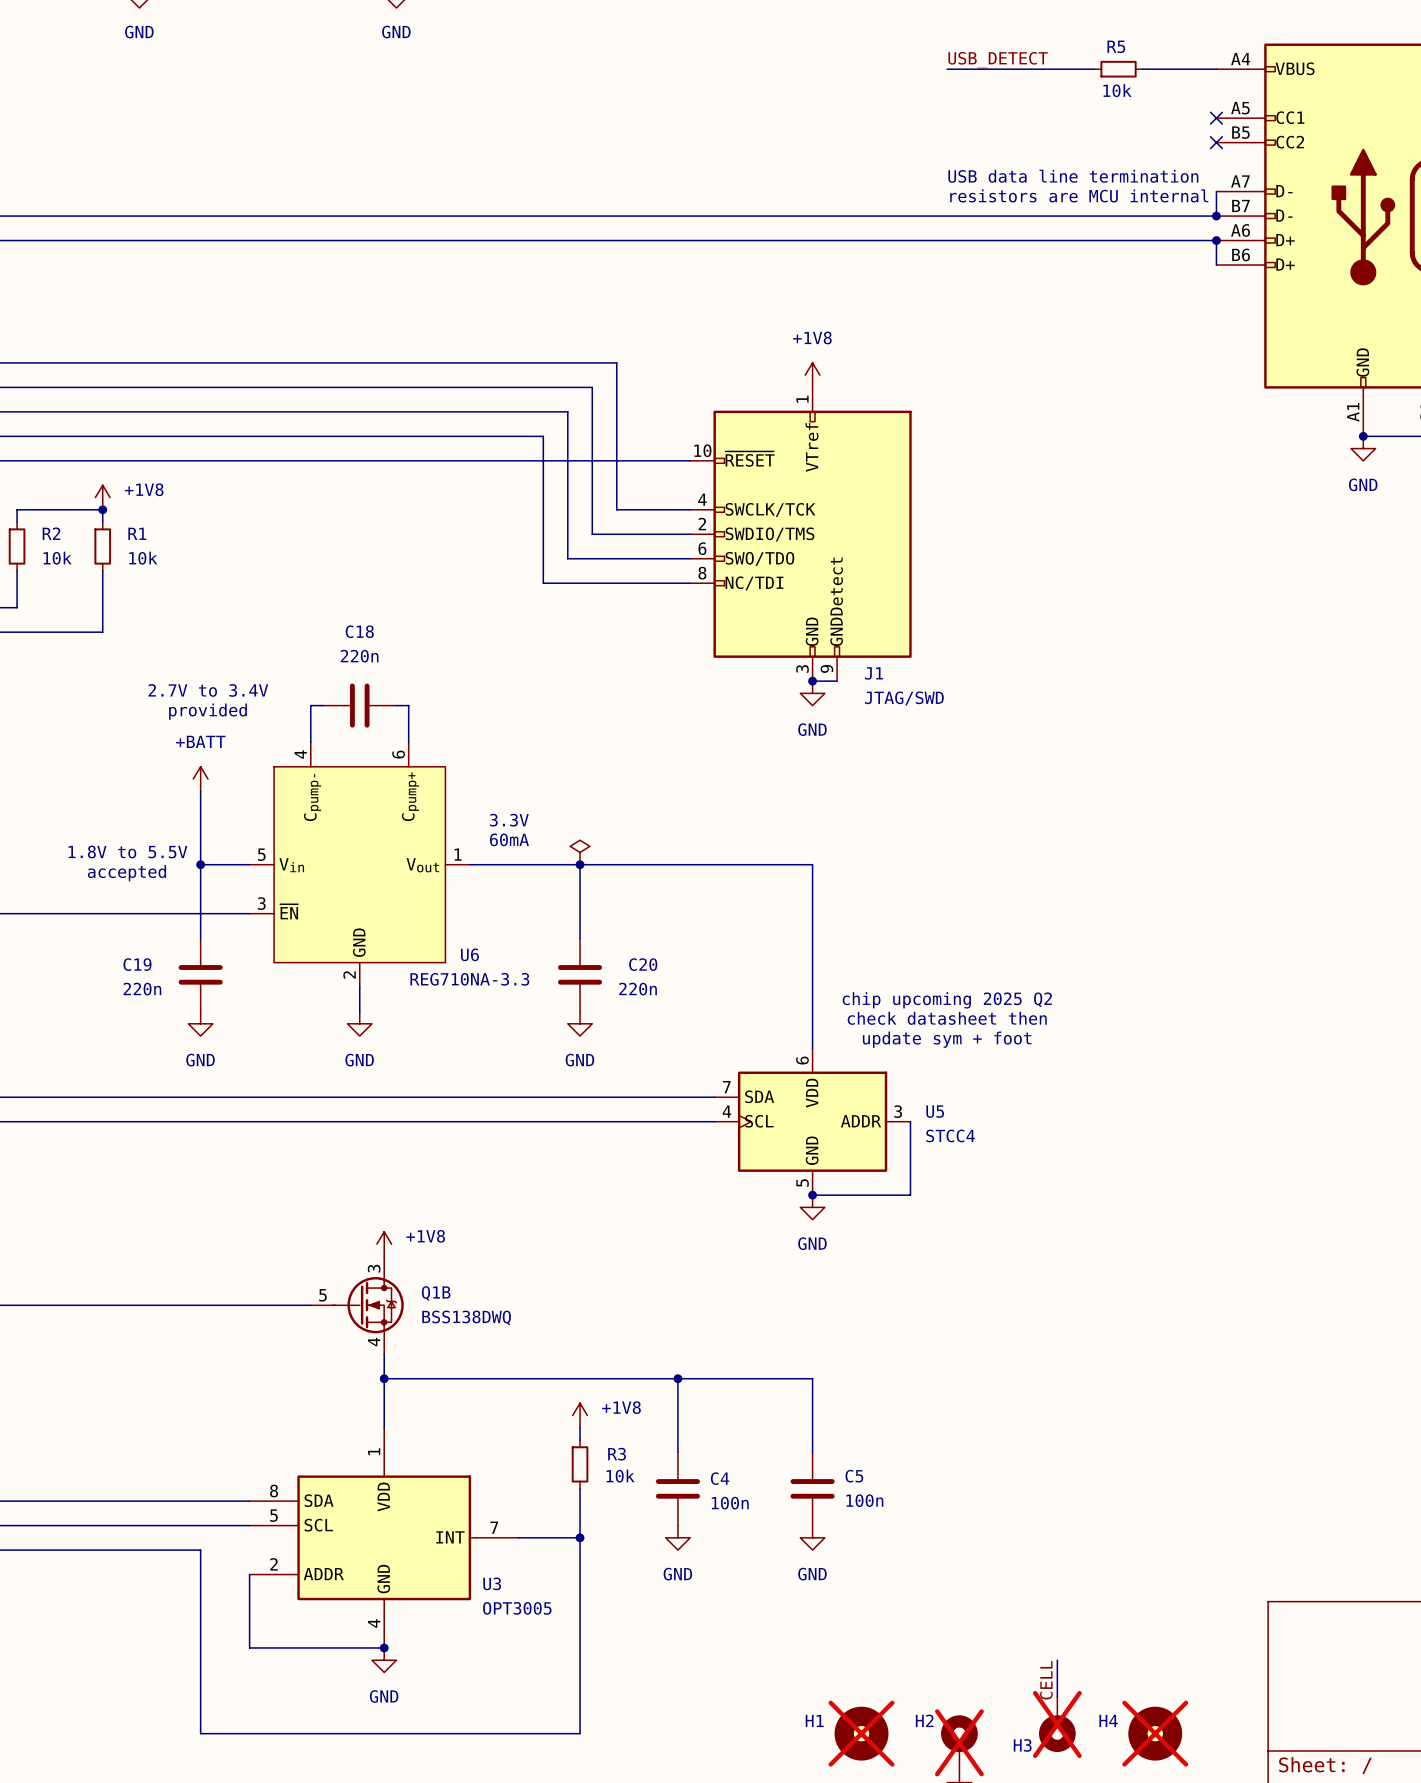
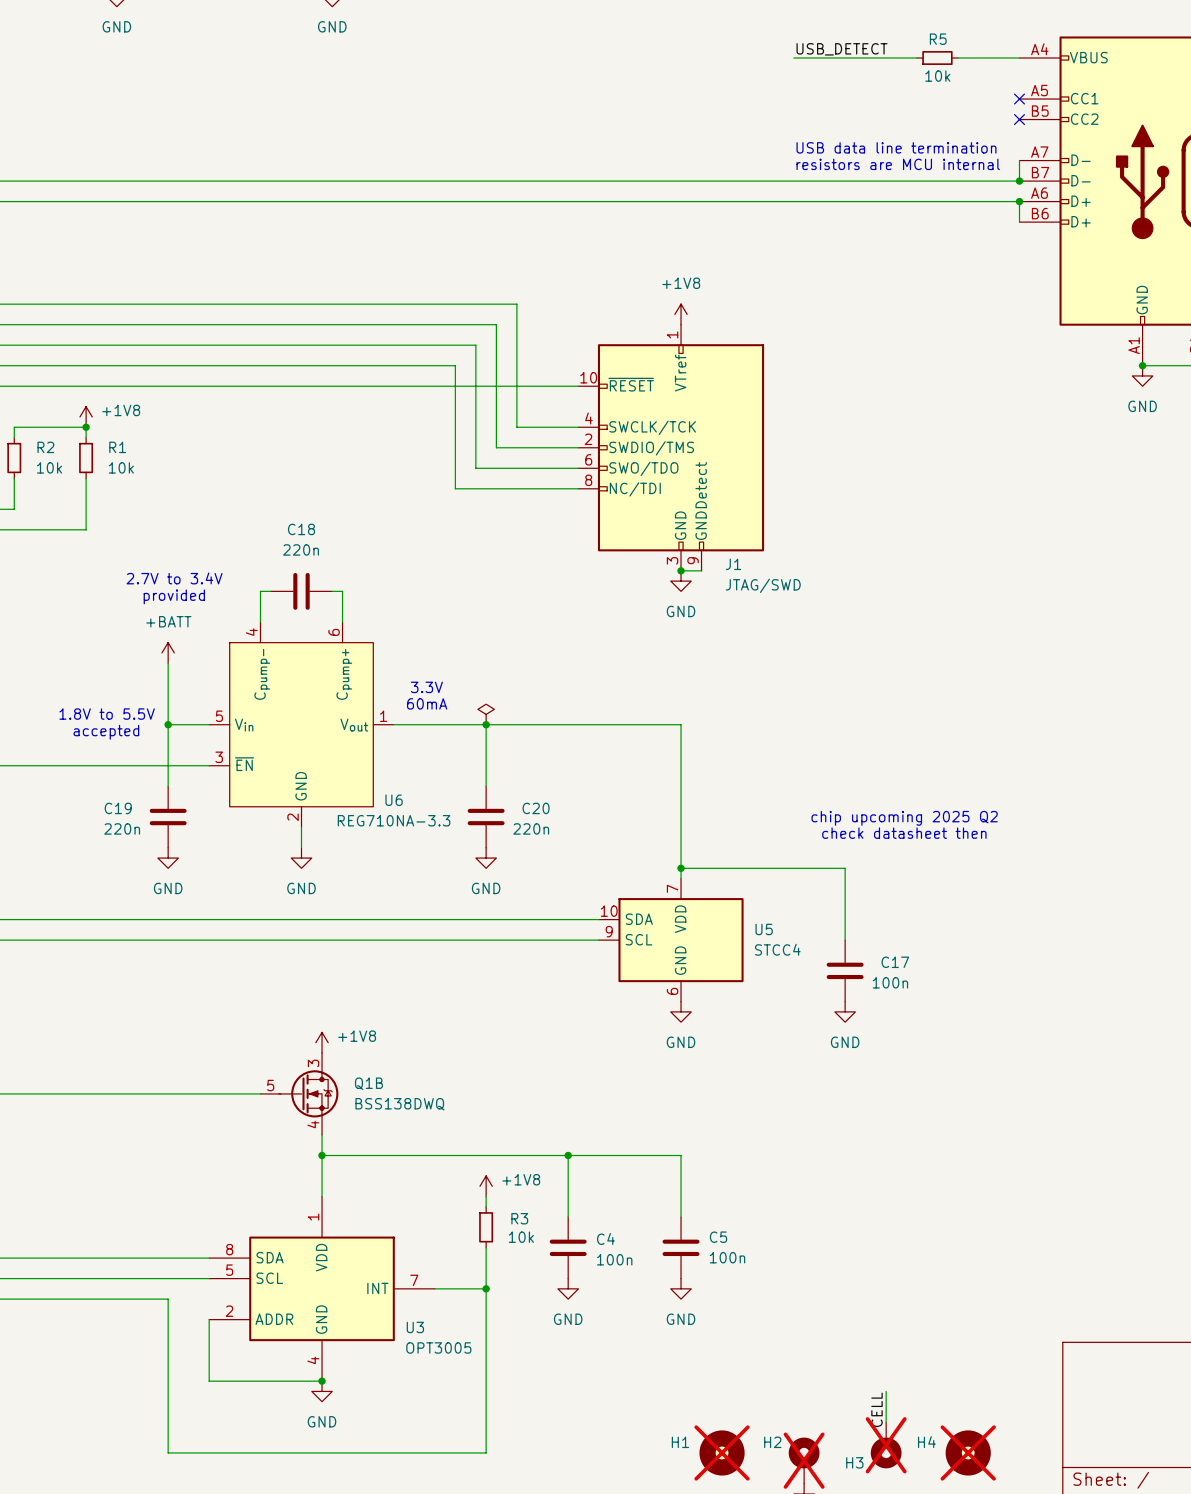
text position: chip upcoming 2025 Q2 (947, 1000) -> chip upcoming 2025 Q2 (904, 818)
text position: check datasheet then (947, 1018) -> check datasheet then (904, 833)
wire: none -> (681, 868) (845, 868) (845, 940)
junction: none -> (681, 868)
text: update sym + foot (947, 1039) -> none
U5 symbol: [714, 1048, 911, 1196] -> [598, 878, 744, 1002]
wire: (910, 1121) (910, 1195) (812, 1195) -> none
C17: none -> 100n (845, 970)
junction: (812, 1195) -> none
power symbol: none -> GND (845, 1011)

